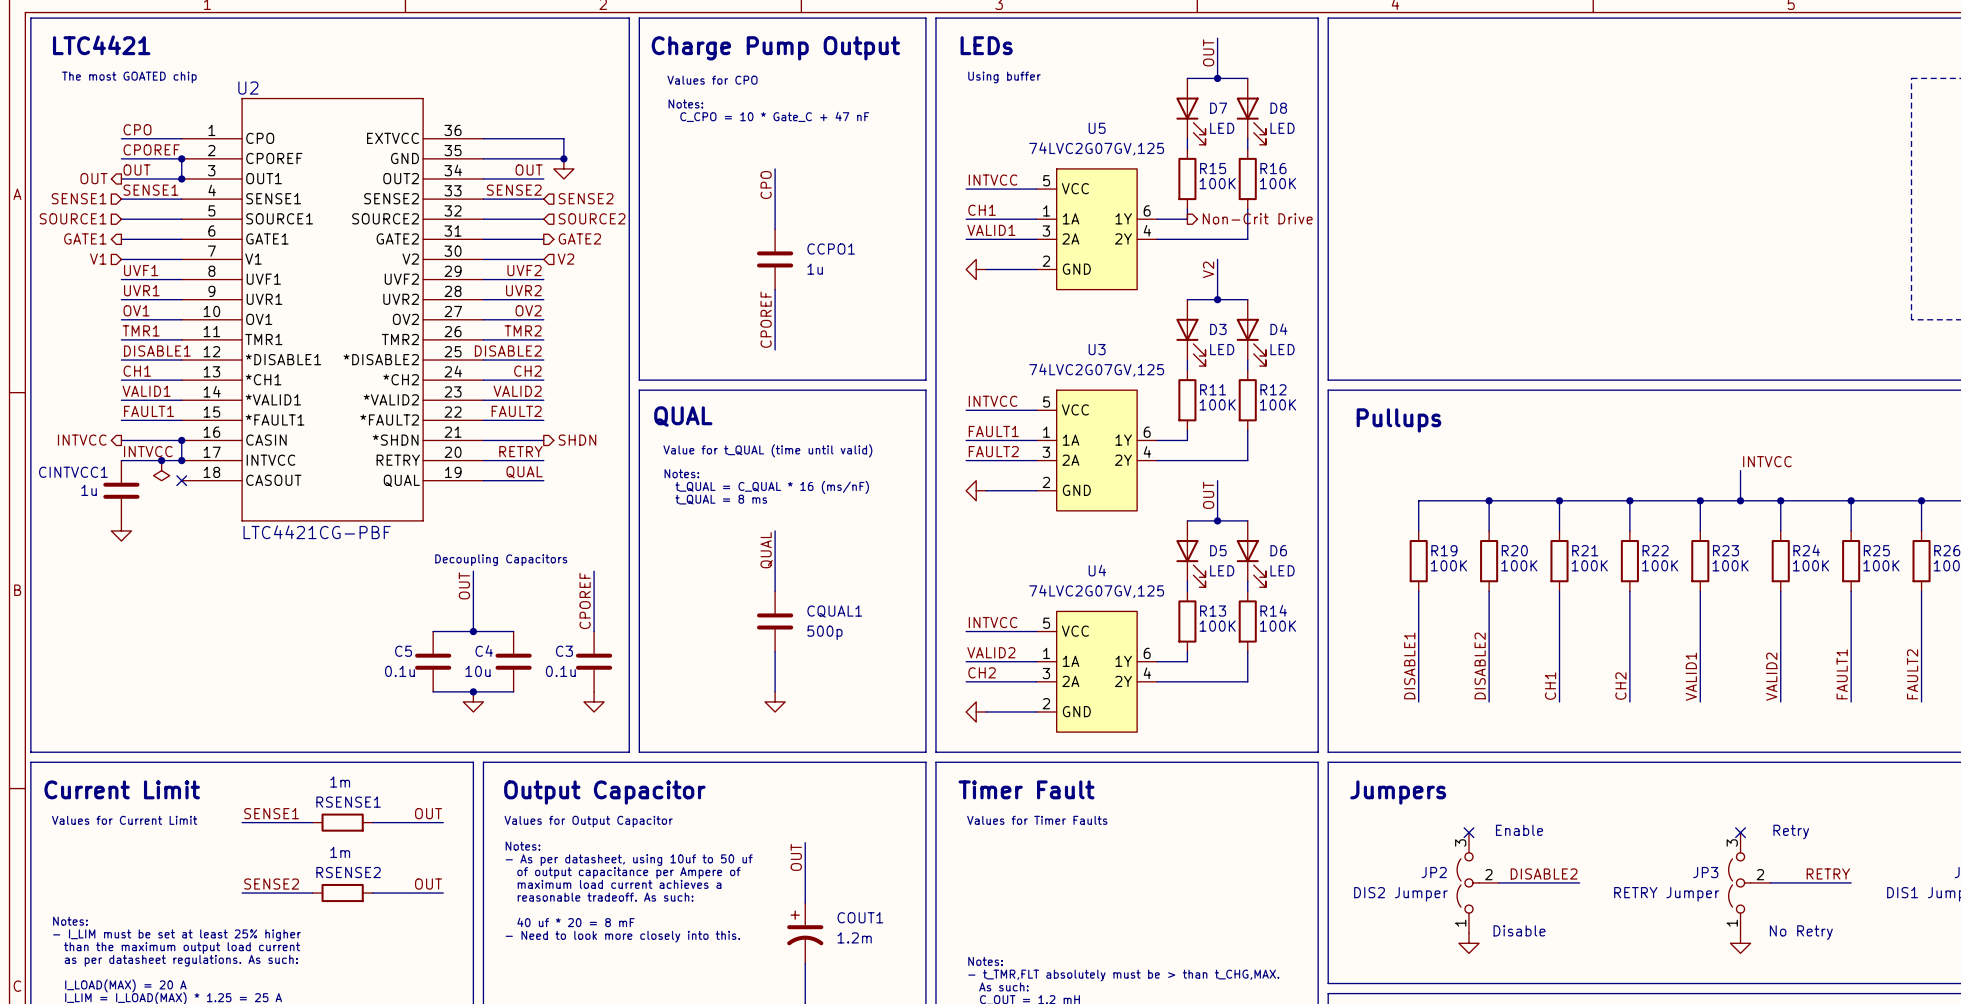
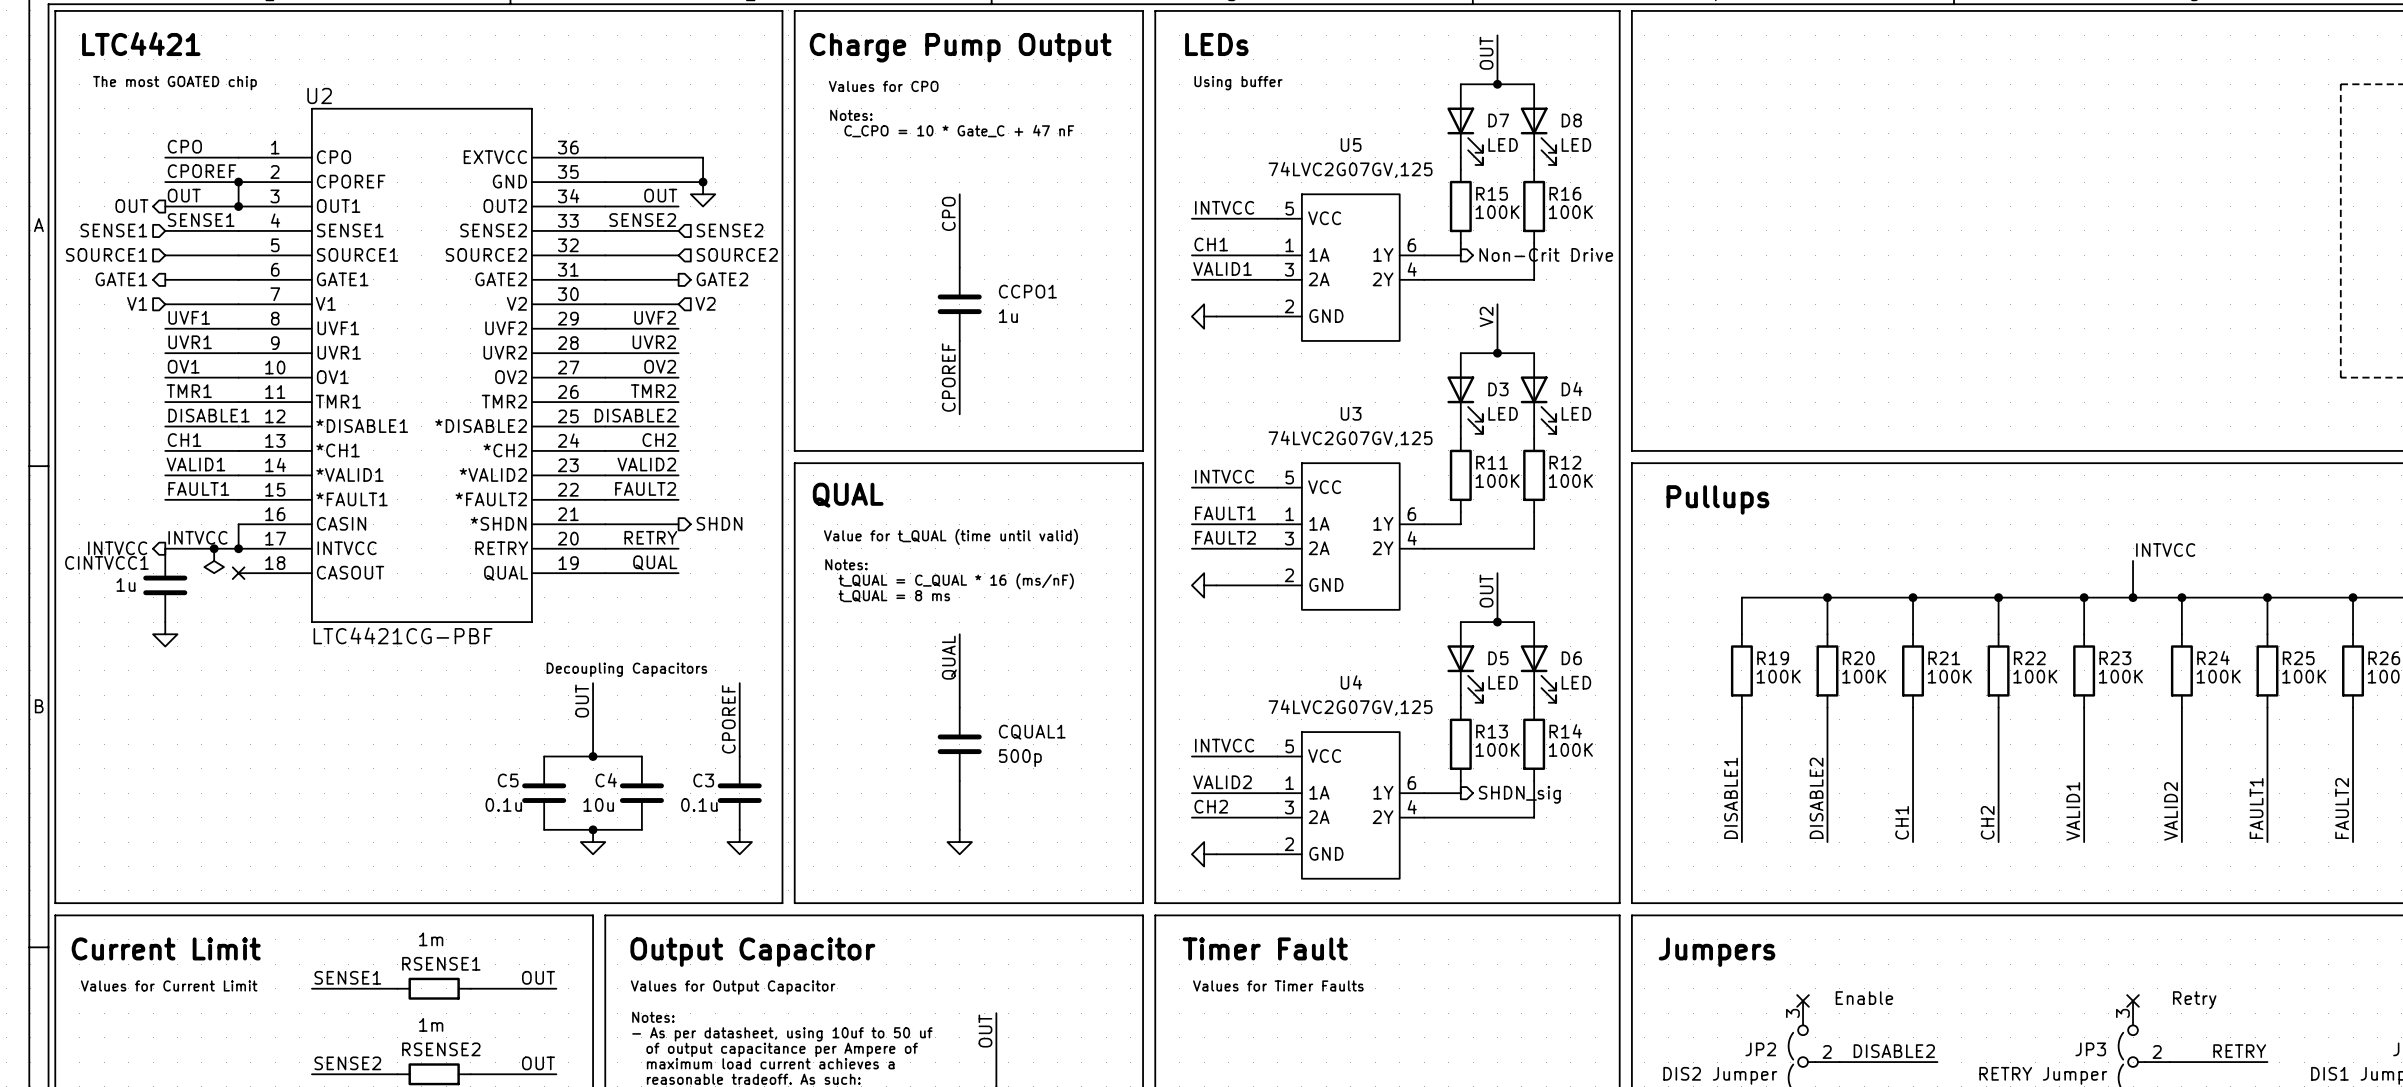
hierarchical label position: INTVCC (82, 440) -> INTVCC (117, 548)
wire: (121, 440) (181, 440) -> none
junction: (181, 440) -> none
hierarchical label: none -> SHDN_sig (1519, 794)

